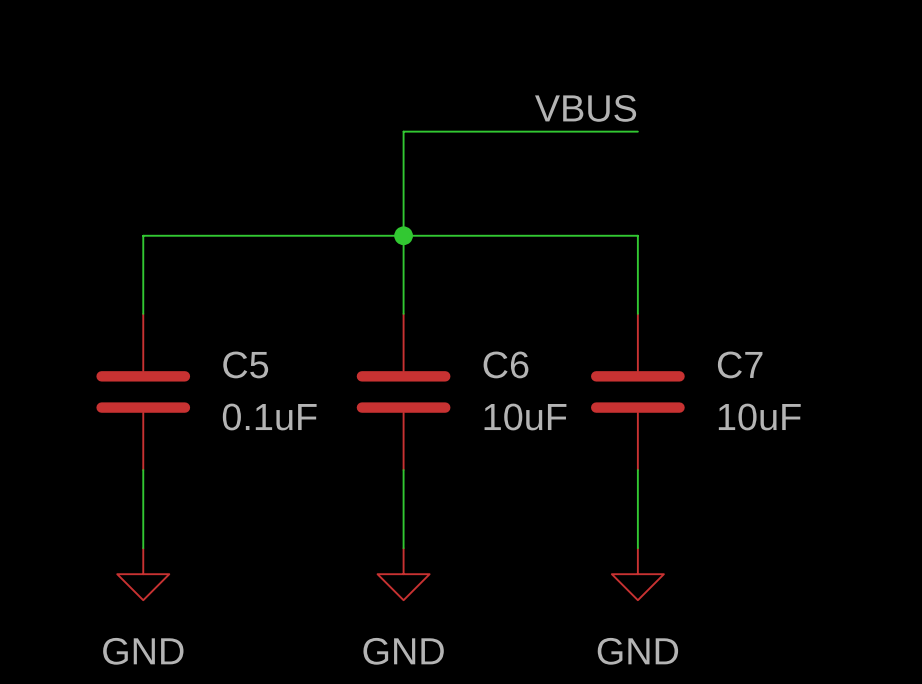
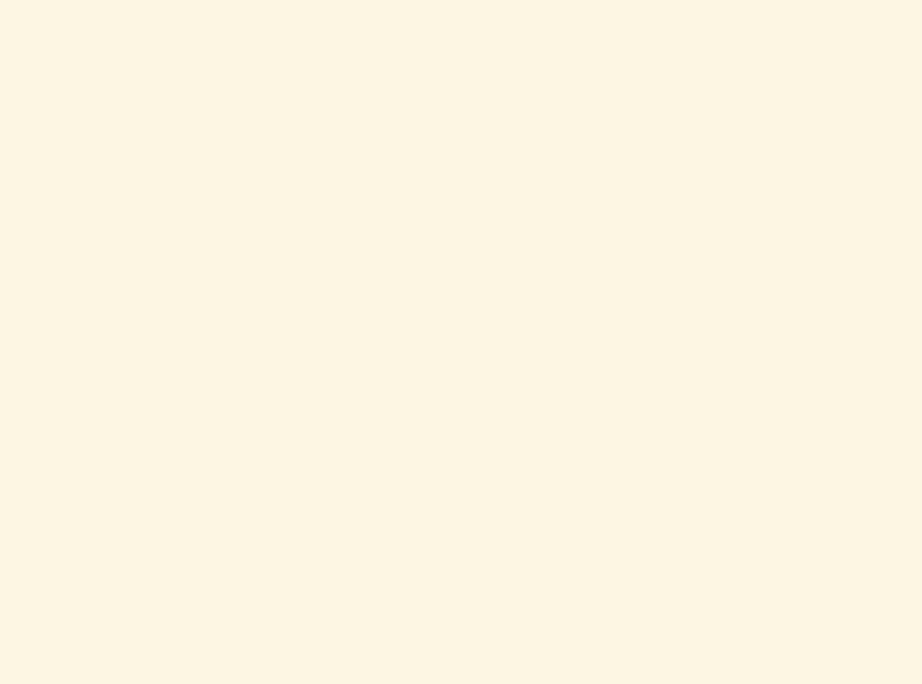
label: VBUS (585, 108) -> none
wire: (637, 131) (403, 131) (403, 313) -> none
junction: (403, 235) -> none
wire: (143, 313) (143, 235) (637, 235) (637, 313) -> none
C5: 0.1uF (143, 391) -> none
C6: 10uF (403, 391) -> none
C7: 10uF (637, 391) -> none
wire: (143, 470) (143, 548) -> none
wire: (403, 470) (403, 548) -> none
wire: (637, 470) (637, 548) -> none
power symbol: GND (143, 574) -> none
power symbol: GND (403, 574) -> none
power symbol: GND (637, 574) -> none

